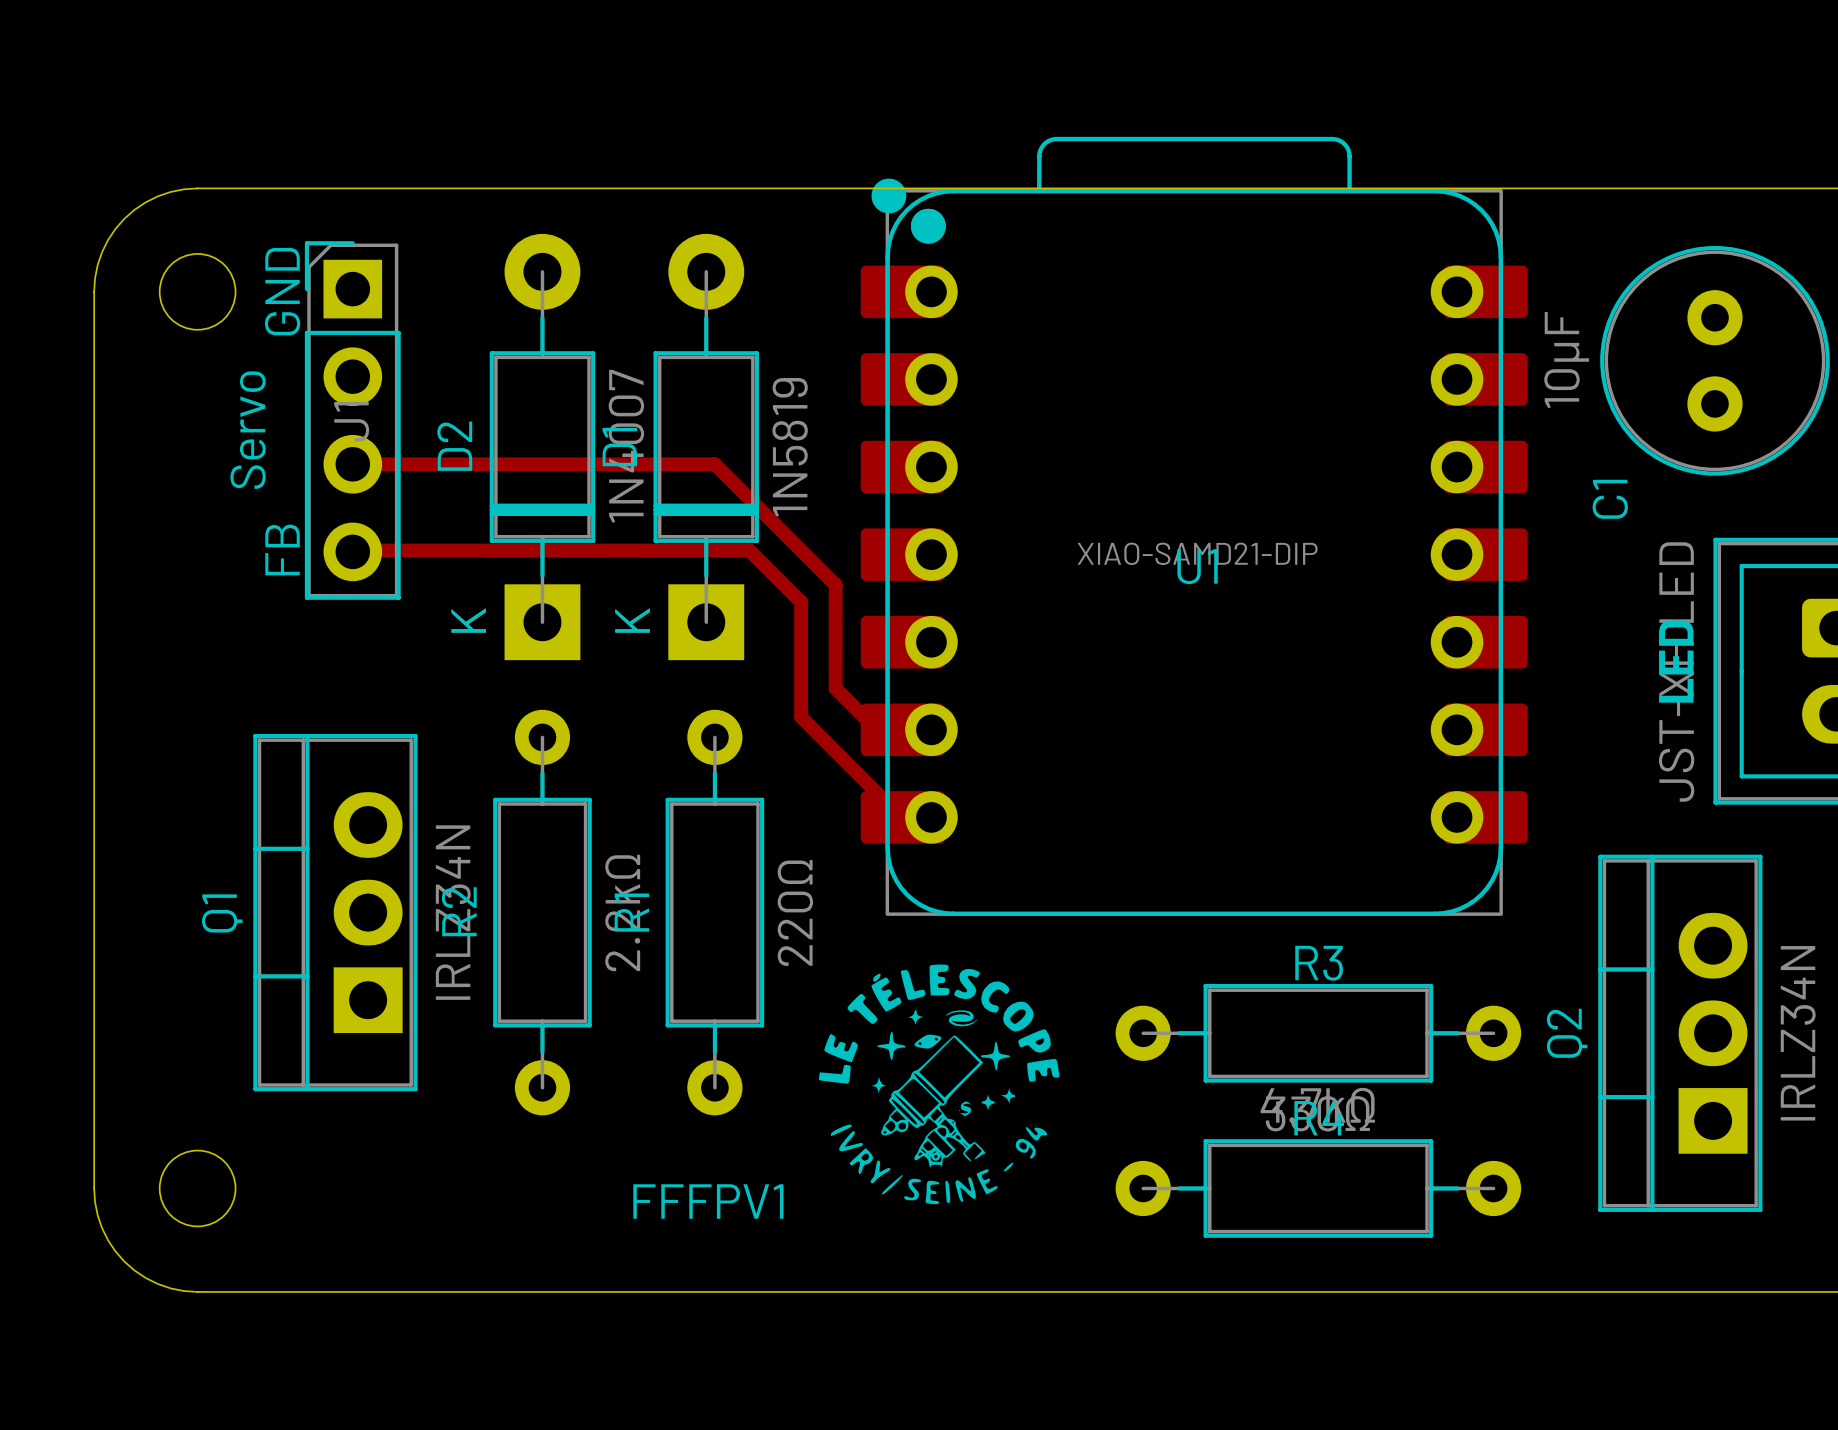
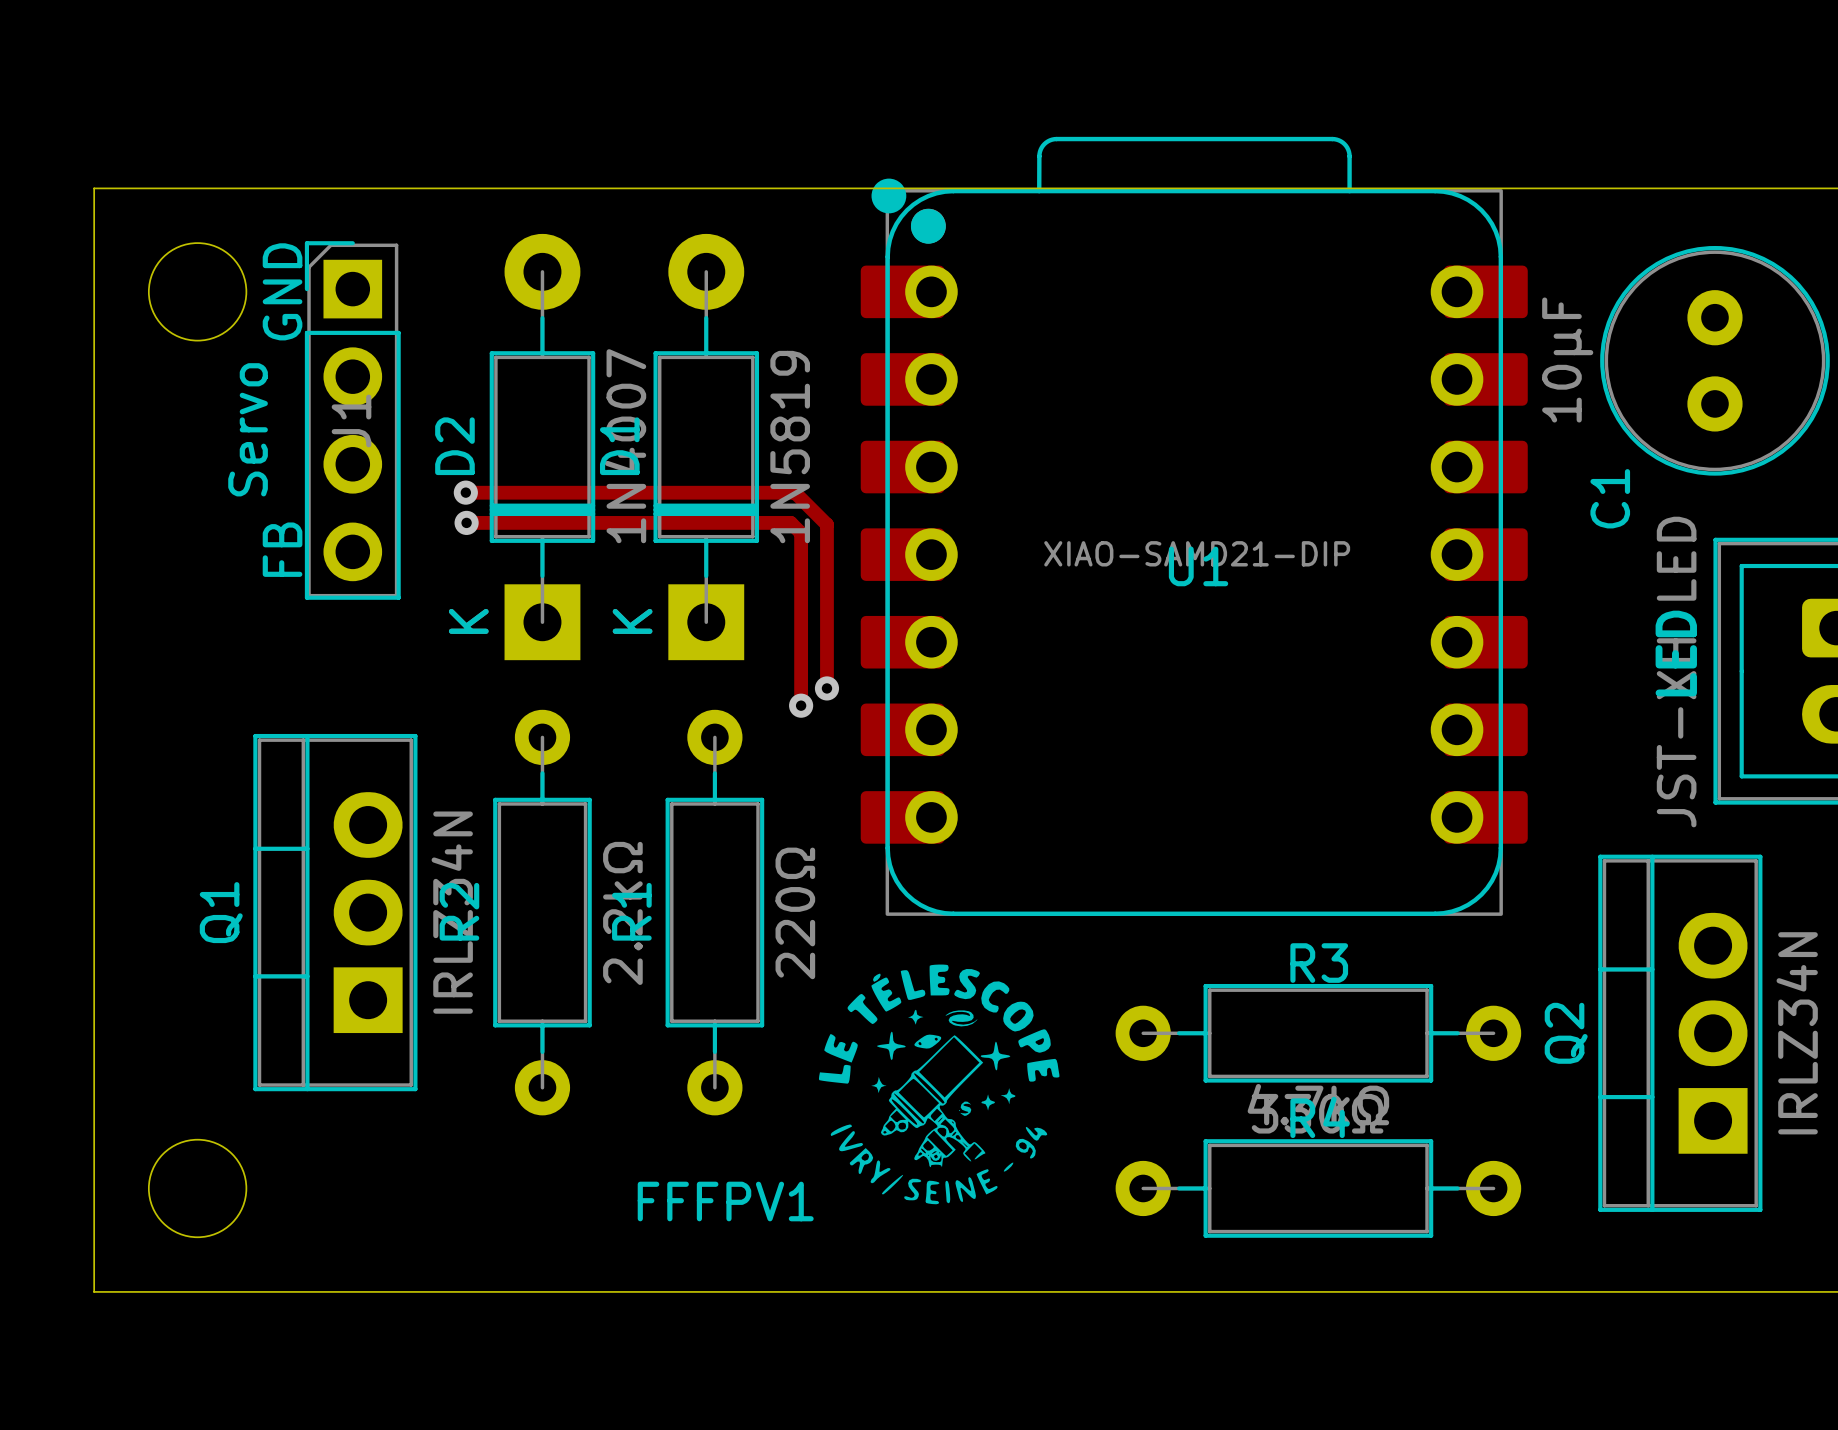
board edge: (197, 188) (184, 189) (158, 196) (145, 202) (124, 218) (108, 240) (102, 252) (97, 265) (94, 291) -> (197, 188) (94, 188) (94, 291)
round board edge size: [158, 253, 237, 331] -> [147, 242, 248, 342]
track: (352, 464) (714, 464) (835, 584) (835, 688) (876, 729) (931, 729) -> none
track: none -> (465, 492) (795, 492) (826, 524) (826, 688)
via: none -> (465, 492)
via: none -> (466, 522)
track: (352, 551) (749, 550) (801, 602) -> (466, 522) (790, 522) (801, 533) (801, 602)
via: none -> (826, 688)
track: (801, 705) (801, 717) (901, 817) (931, 817) -> none
via: none -> (801, 705)
round board edge size: [158, 1149, 237, 1228] -> [147, 1138, 248, 1239]
board edge: (94, 1188) (95, 1201) (102, 1228) (108, 1240) (124, 1261) (145, 1278) (158, 1284) (184, 1291) (197, 1291) -> (94, 1188) (94, 1291) (197, 1291)

